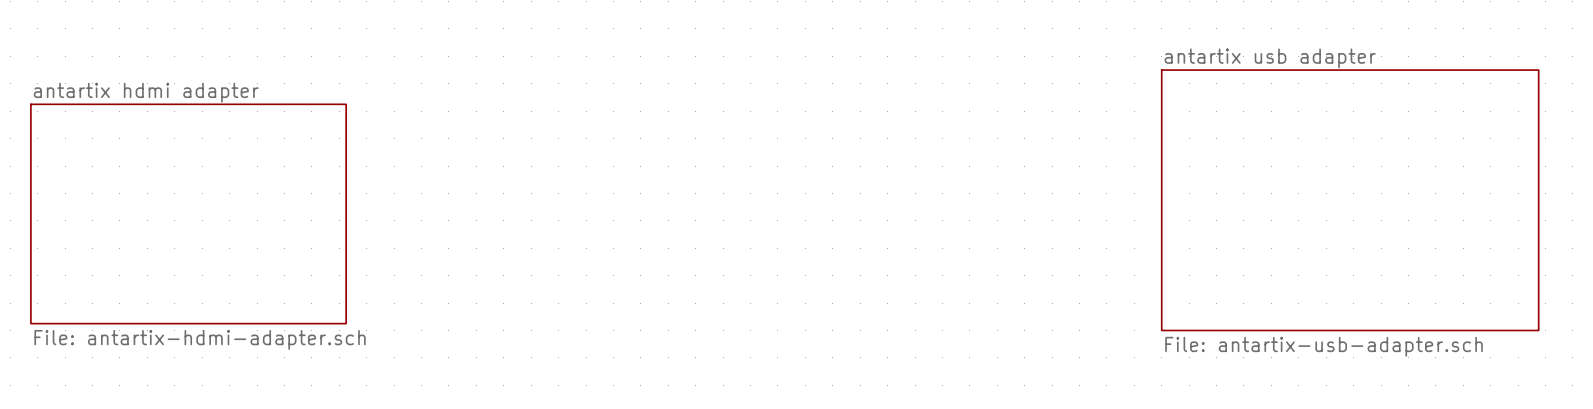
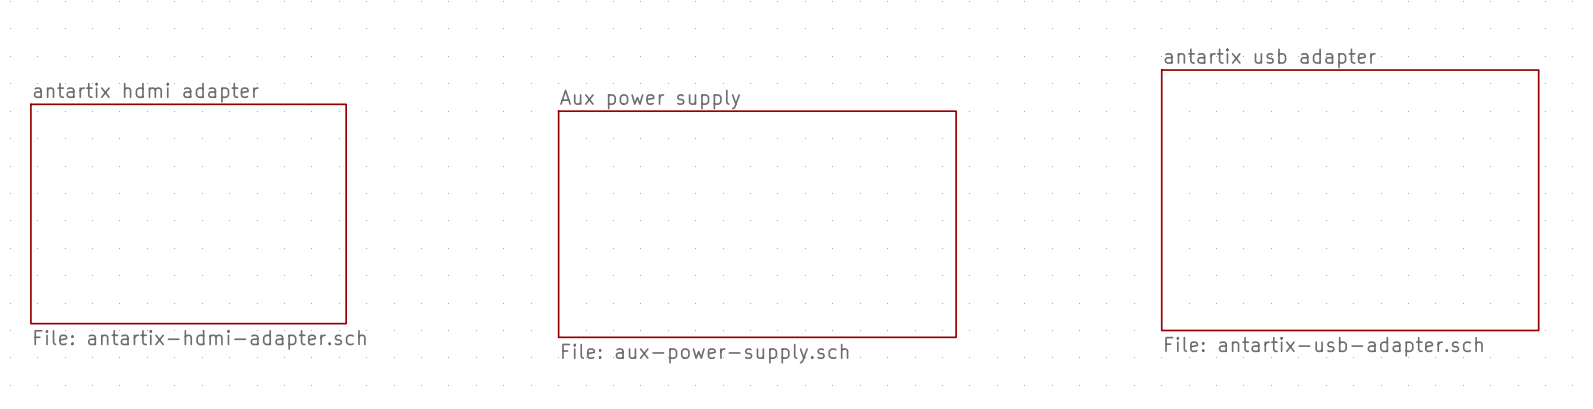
sheet Aux power supply: none -> File: aux-power-supply.sch (757, 224)

